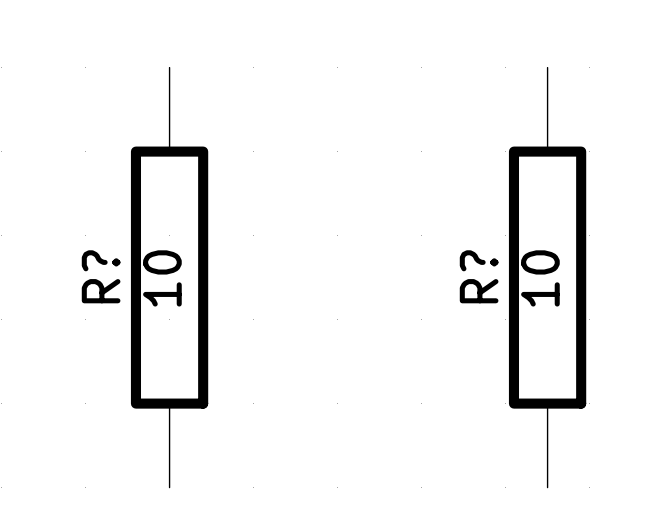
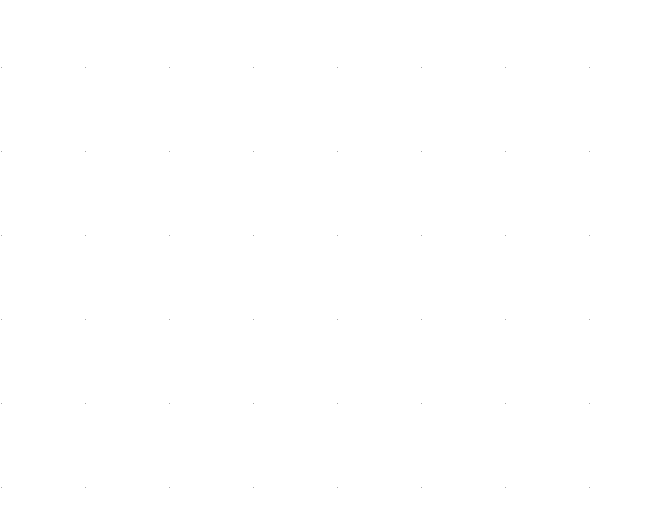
R?: 10 (169, 277) -> none
R?: 10 (547, 277) -> none

